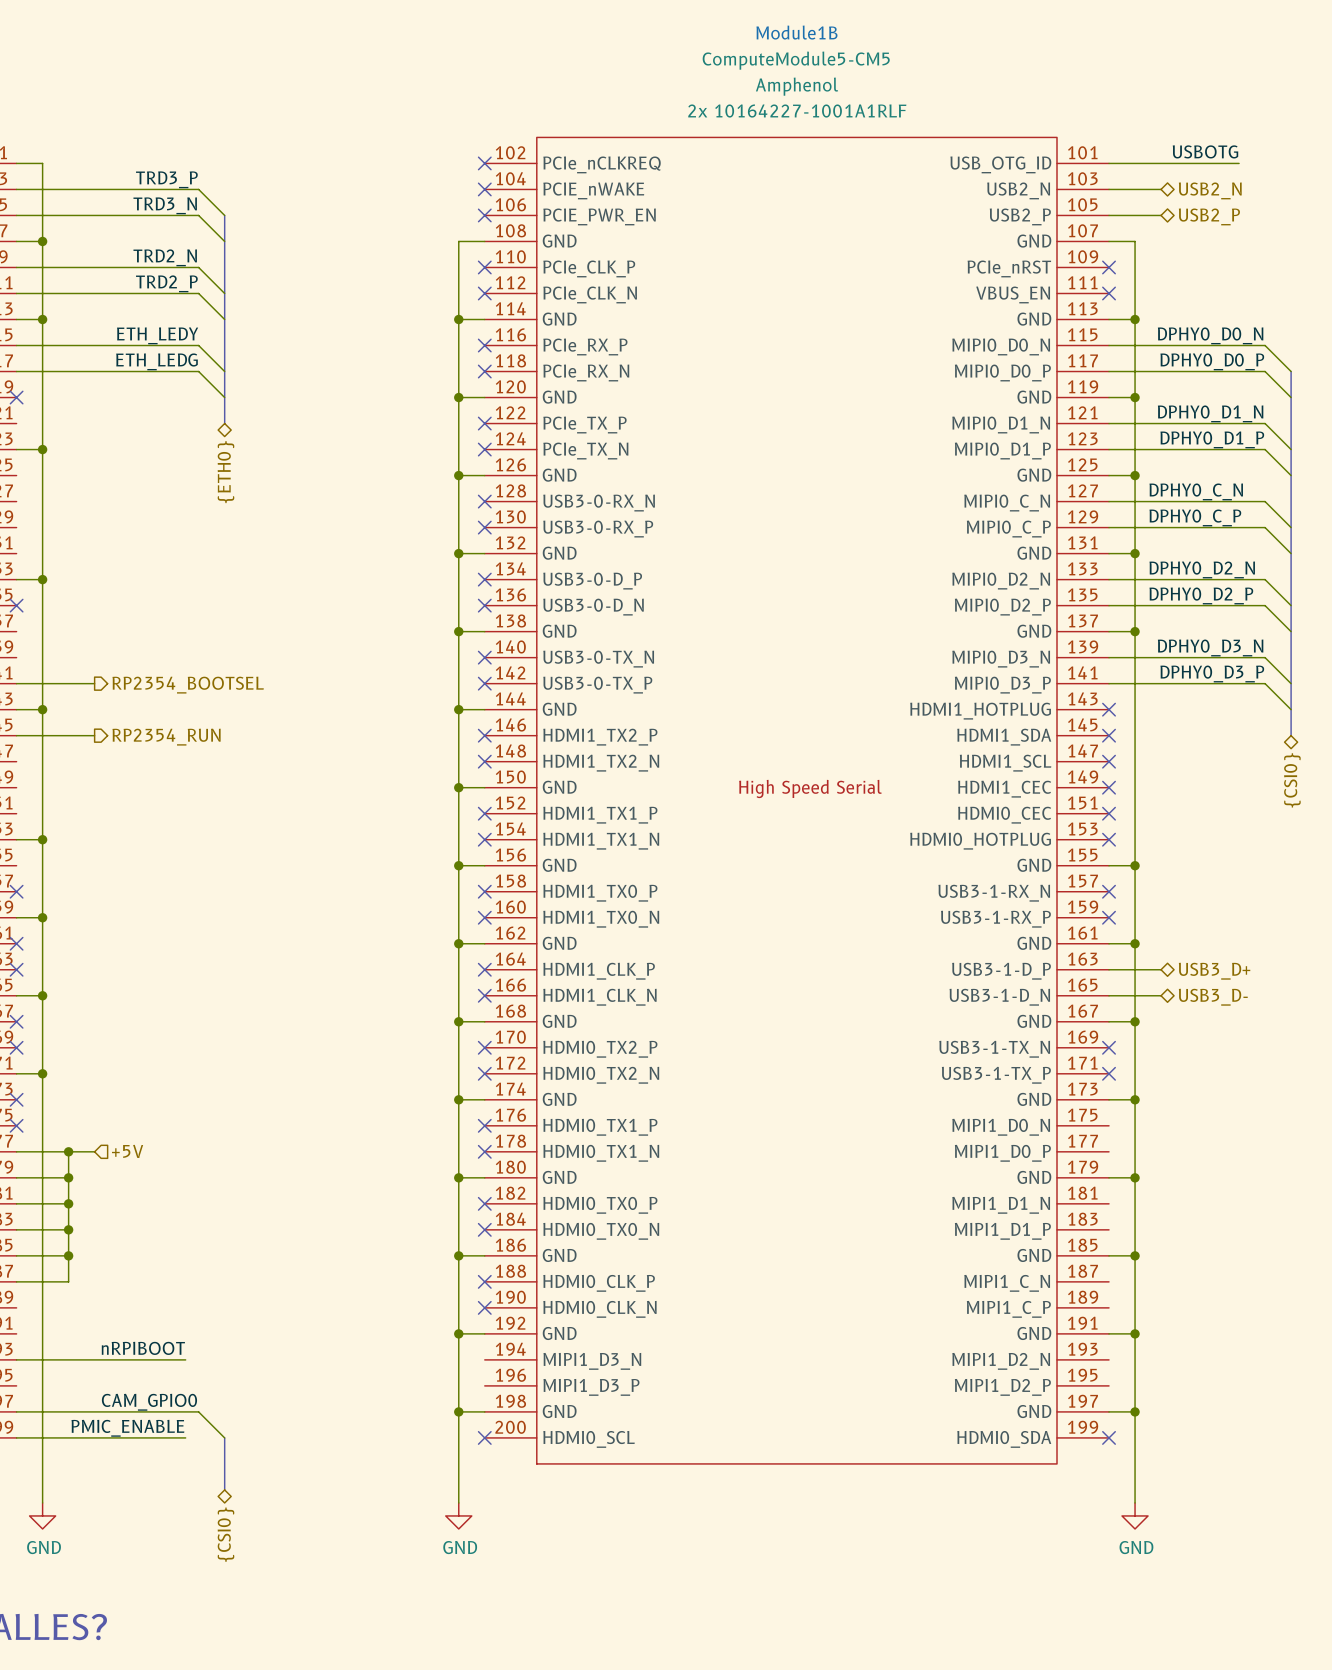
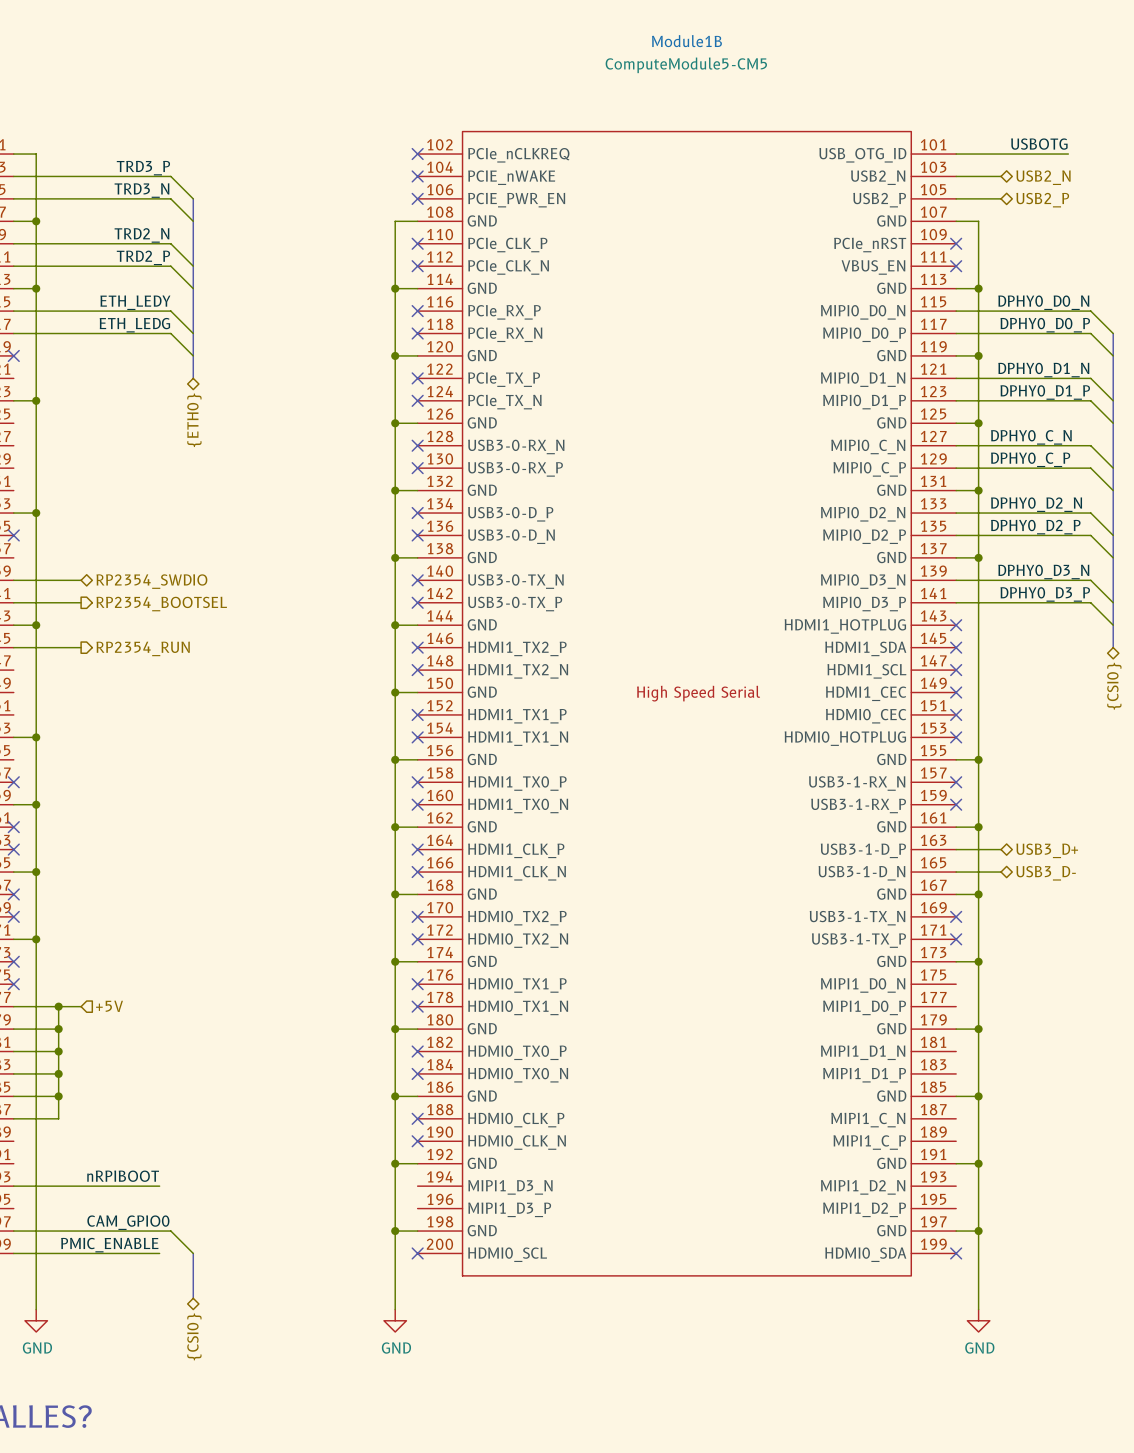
Module1B text: Amphenol (797, 86) -> none
Module1B text: 2x 10164227-1001A1RLF (797, 111) -> none
wire: none -> (13, 580) (81, 580)
hierarchical label: none -> RP2354_SWDIO (151, 581)

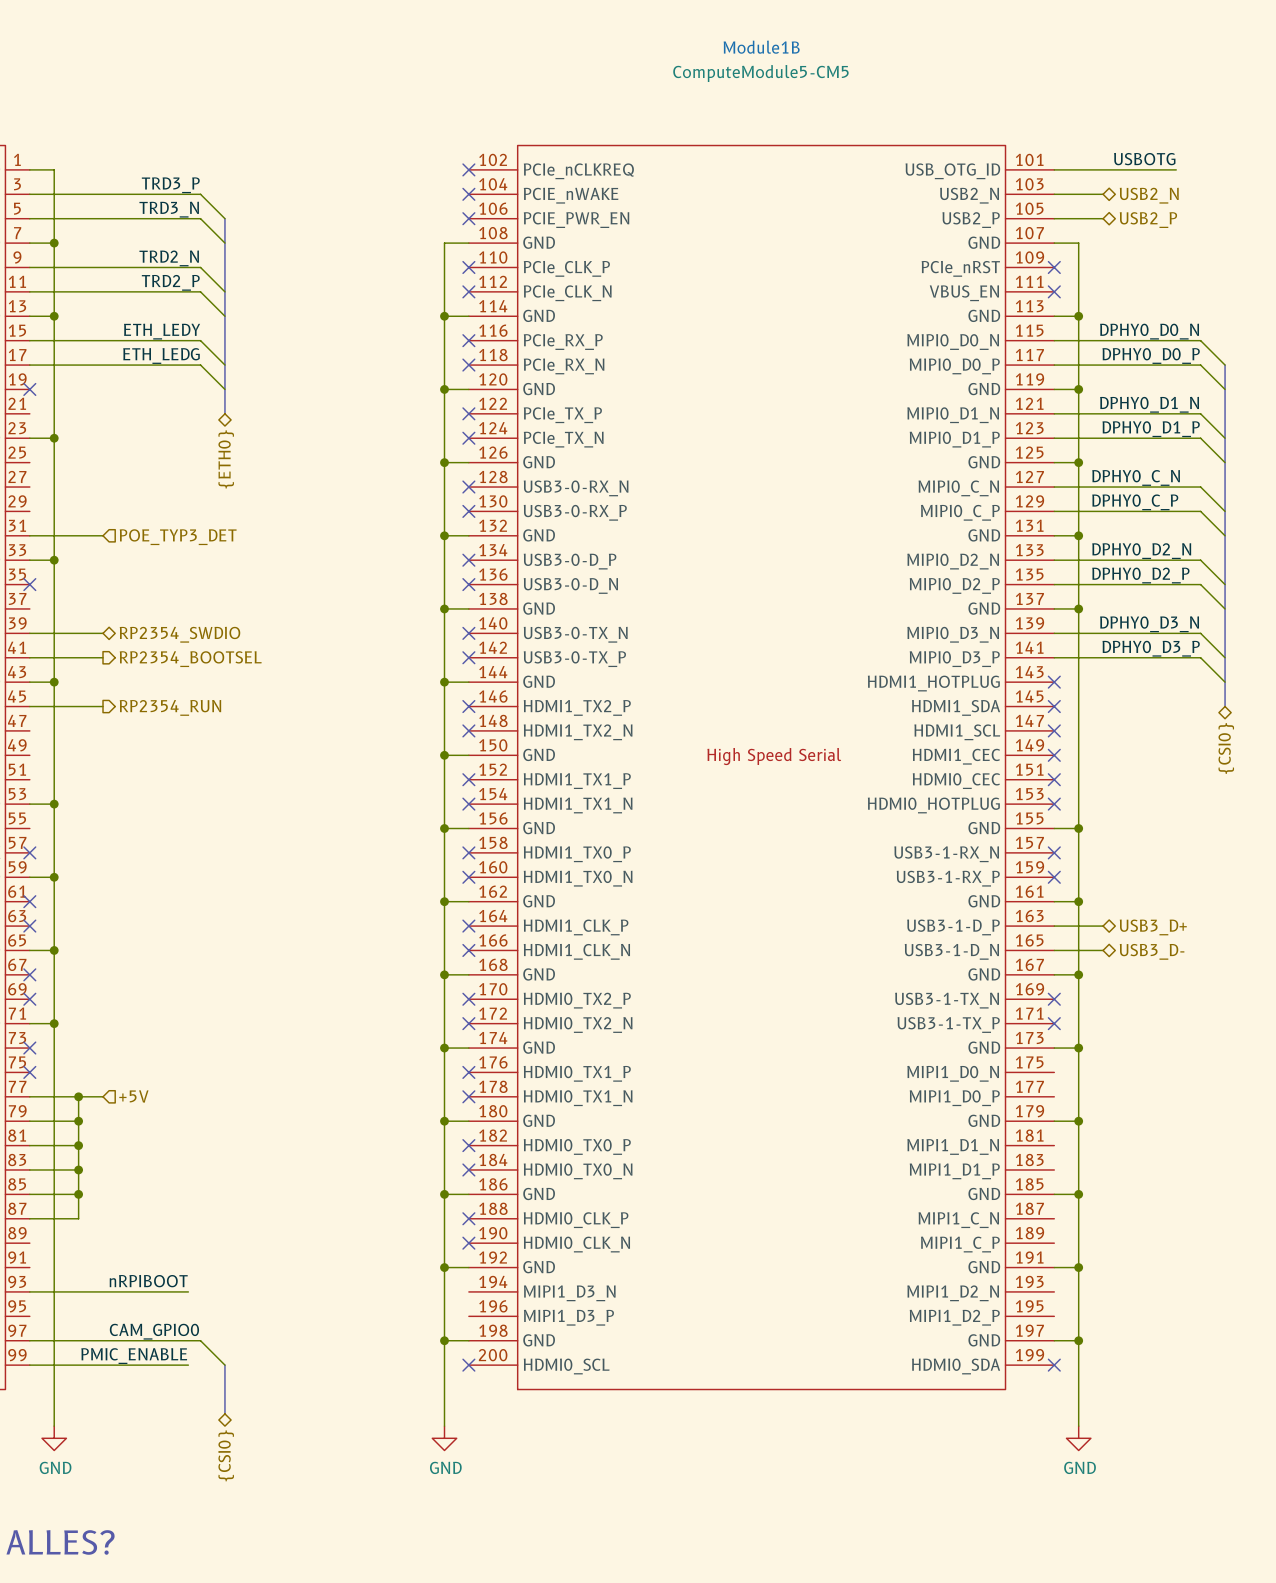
wire: none -> (29, 535) (103, 535)
hierarchical label: none -> POE_TYP3_DET (178, 537)

